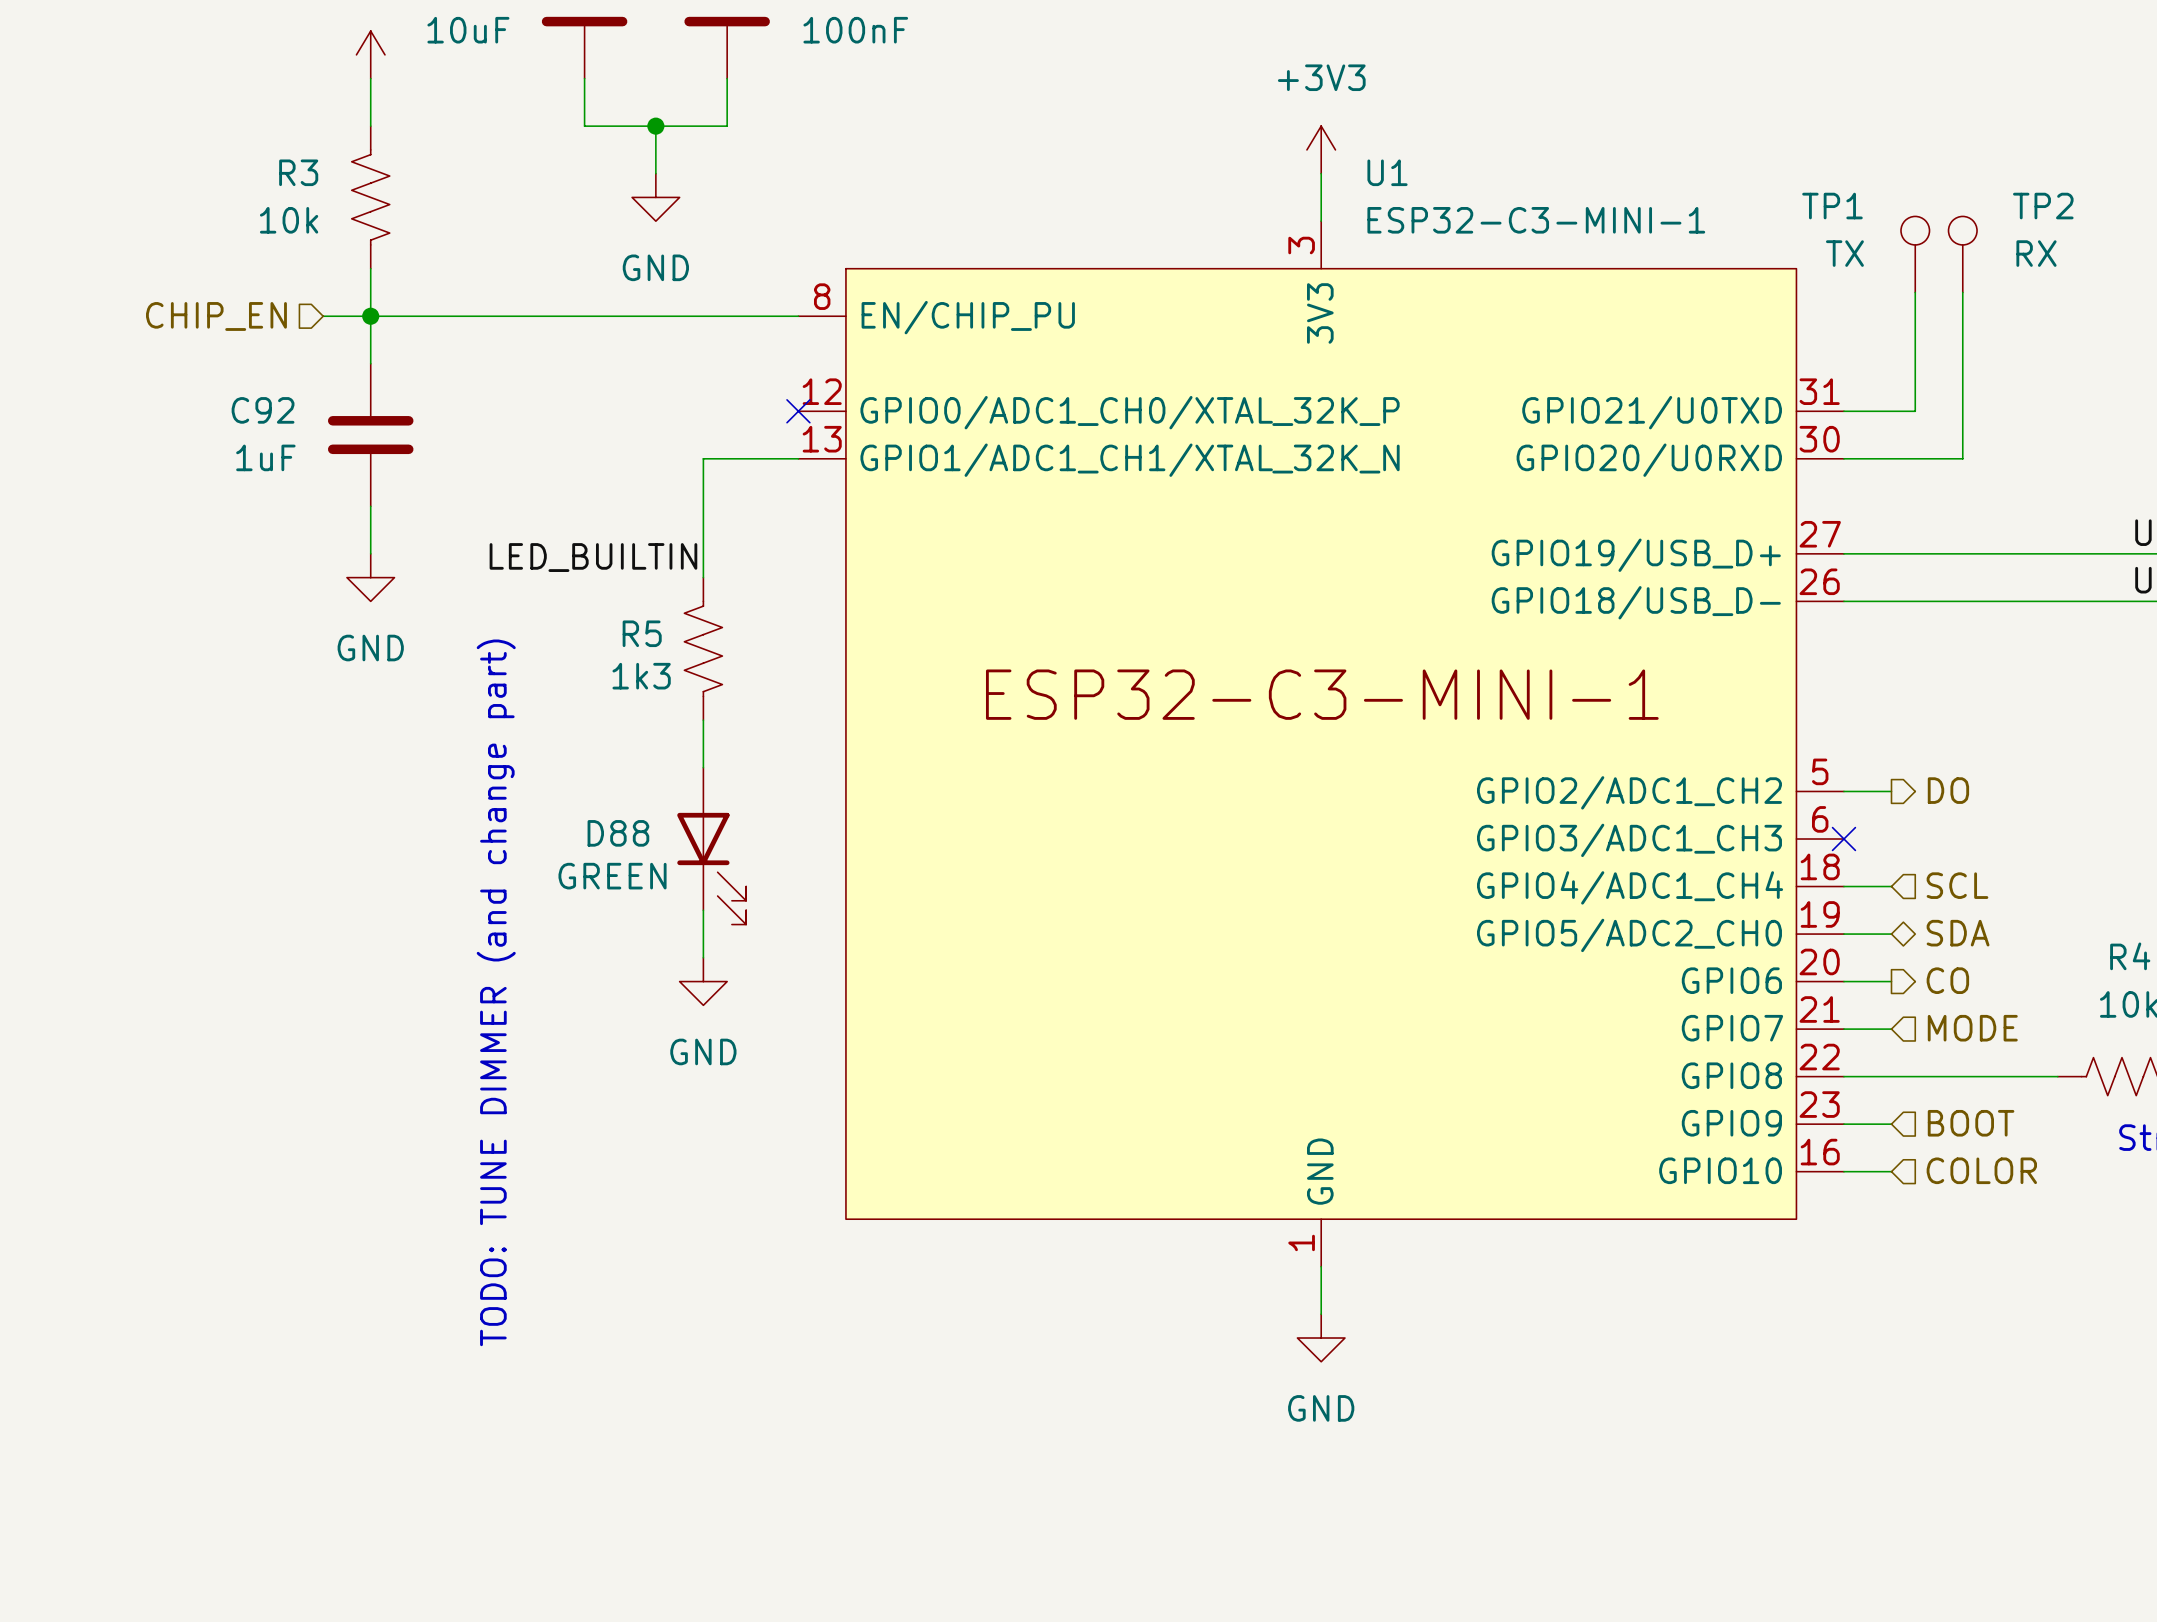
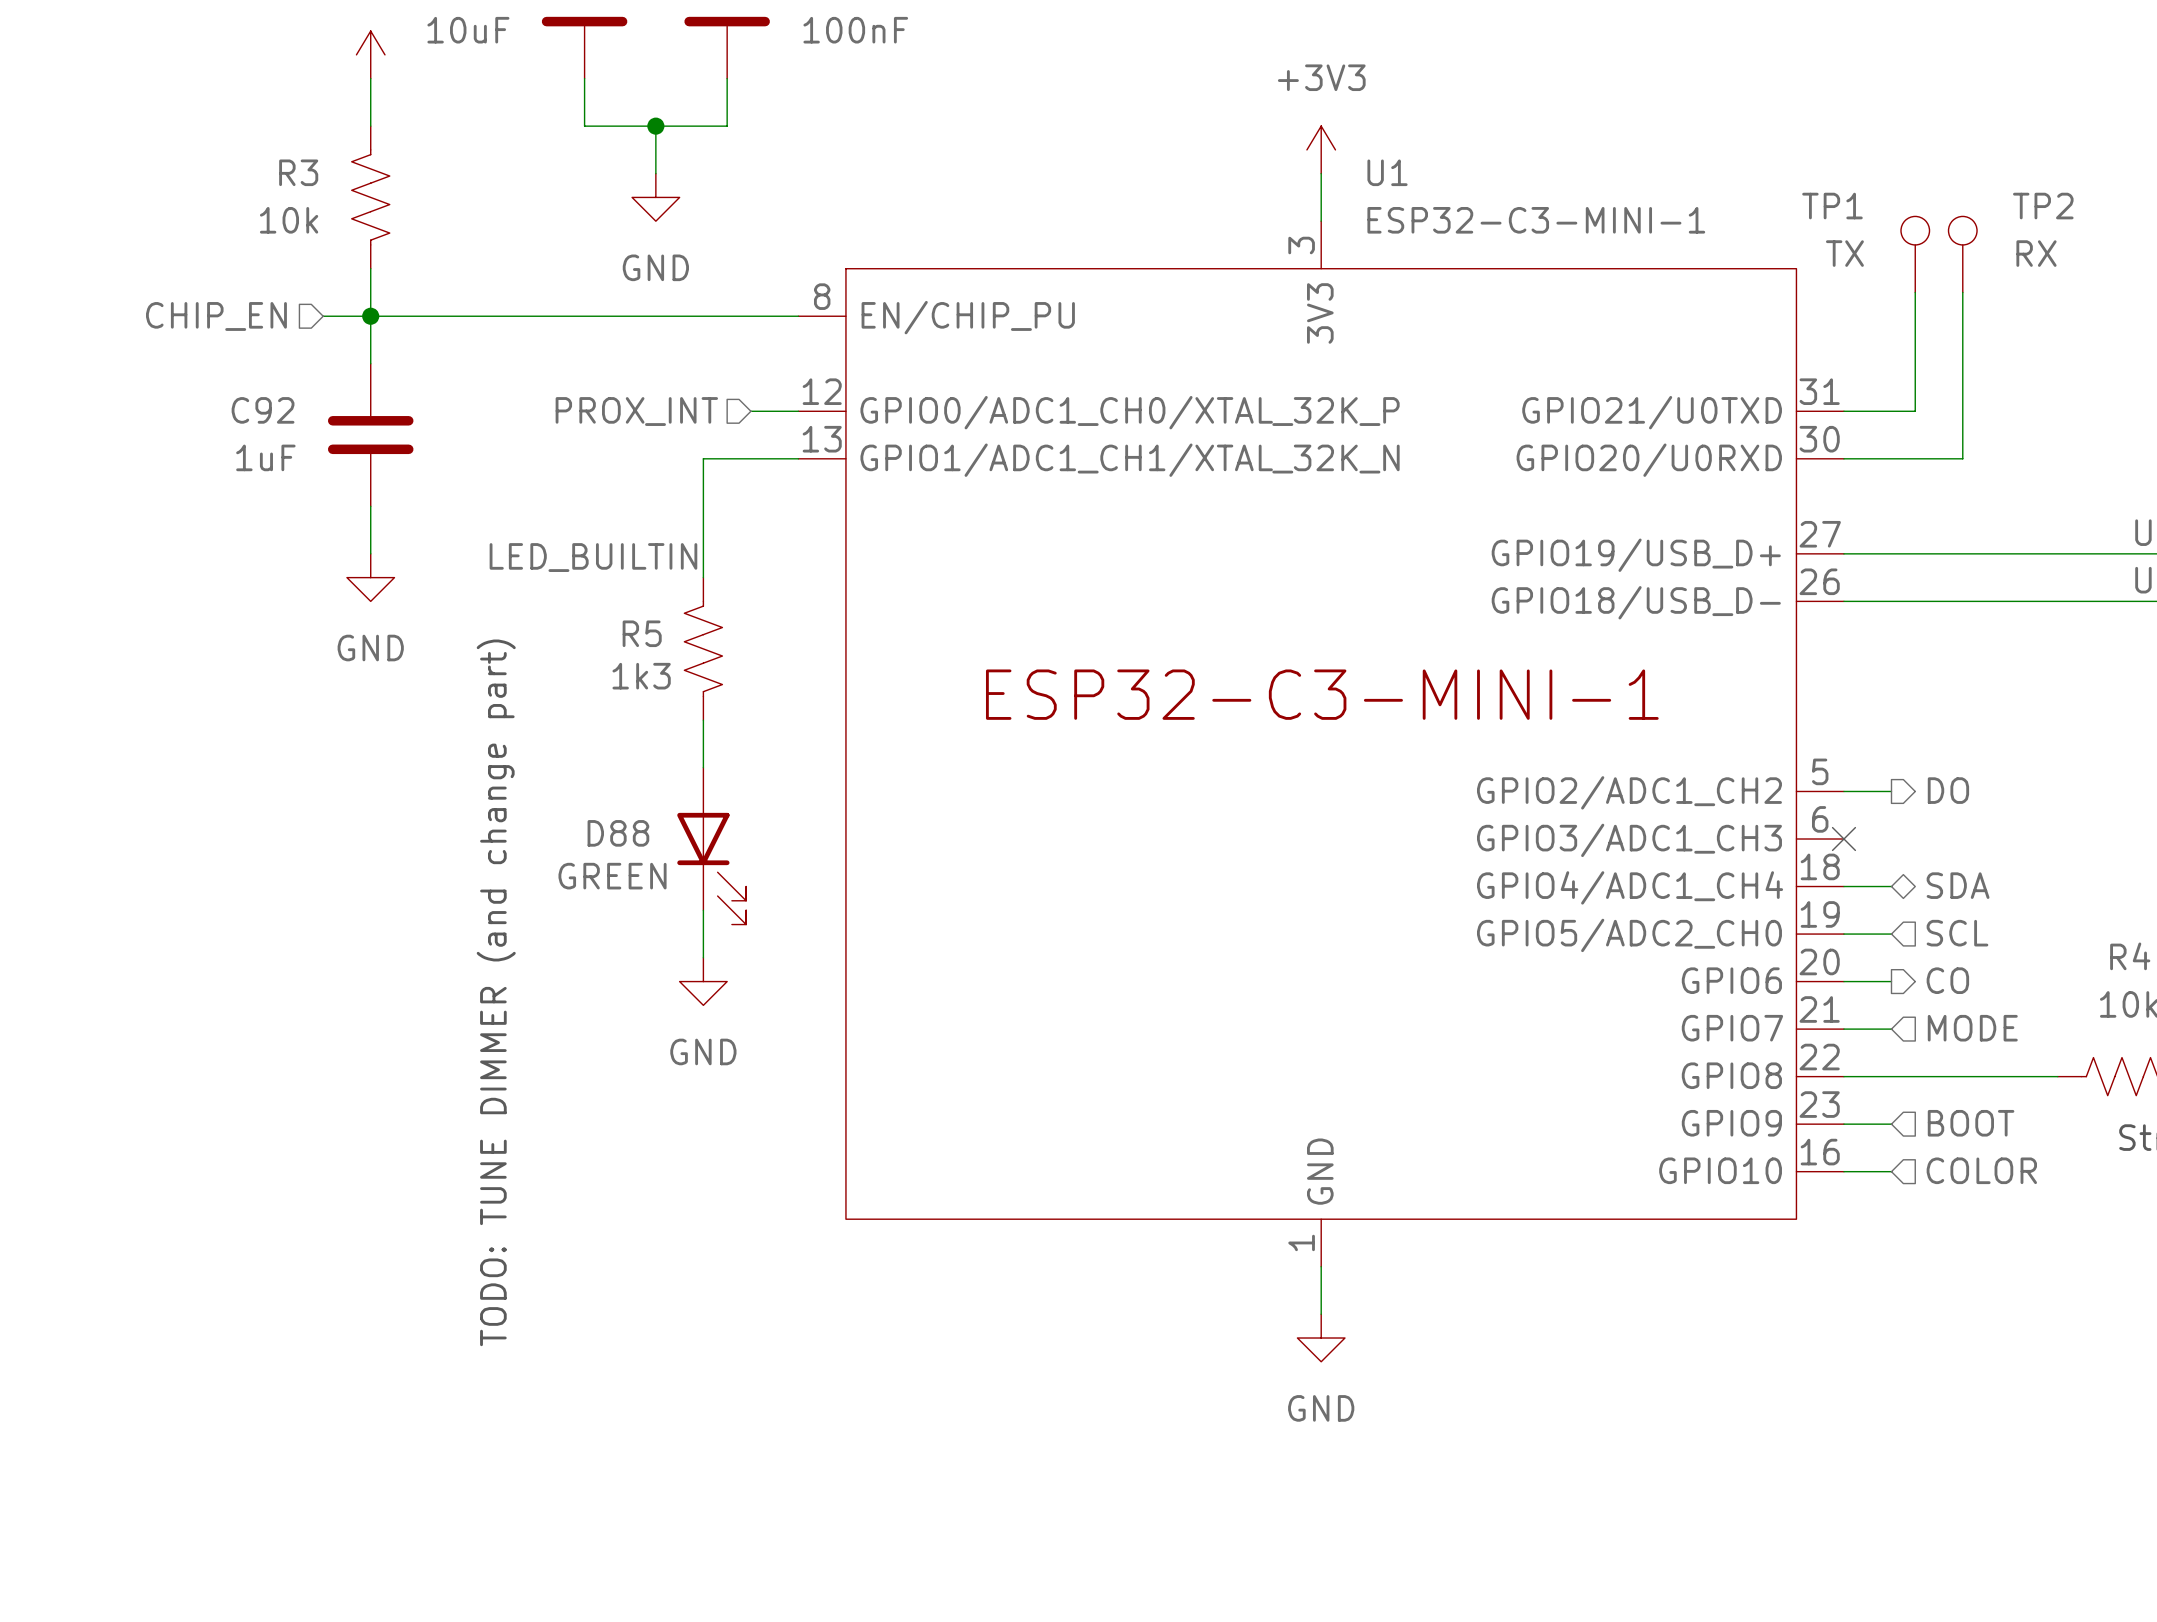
hierarchical label: none -> PROX_INT (636, 411)
wire: none -> (750, 411) (798, 411)
no-connect mark: (798, 411) -> none
hierarchical label shape: input (1957, 885) -> bidirectional (1958, 885)
hierarchical label: SCL (1957, 885) -> SDA (1958, 885)
hierarchical label shape: bidirectional (1958, 933) -> input (1957, 933)
hierarchical label: SDA (1958, 933) -> SCL (1957, 933)

